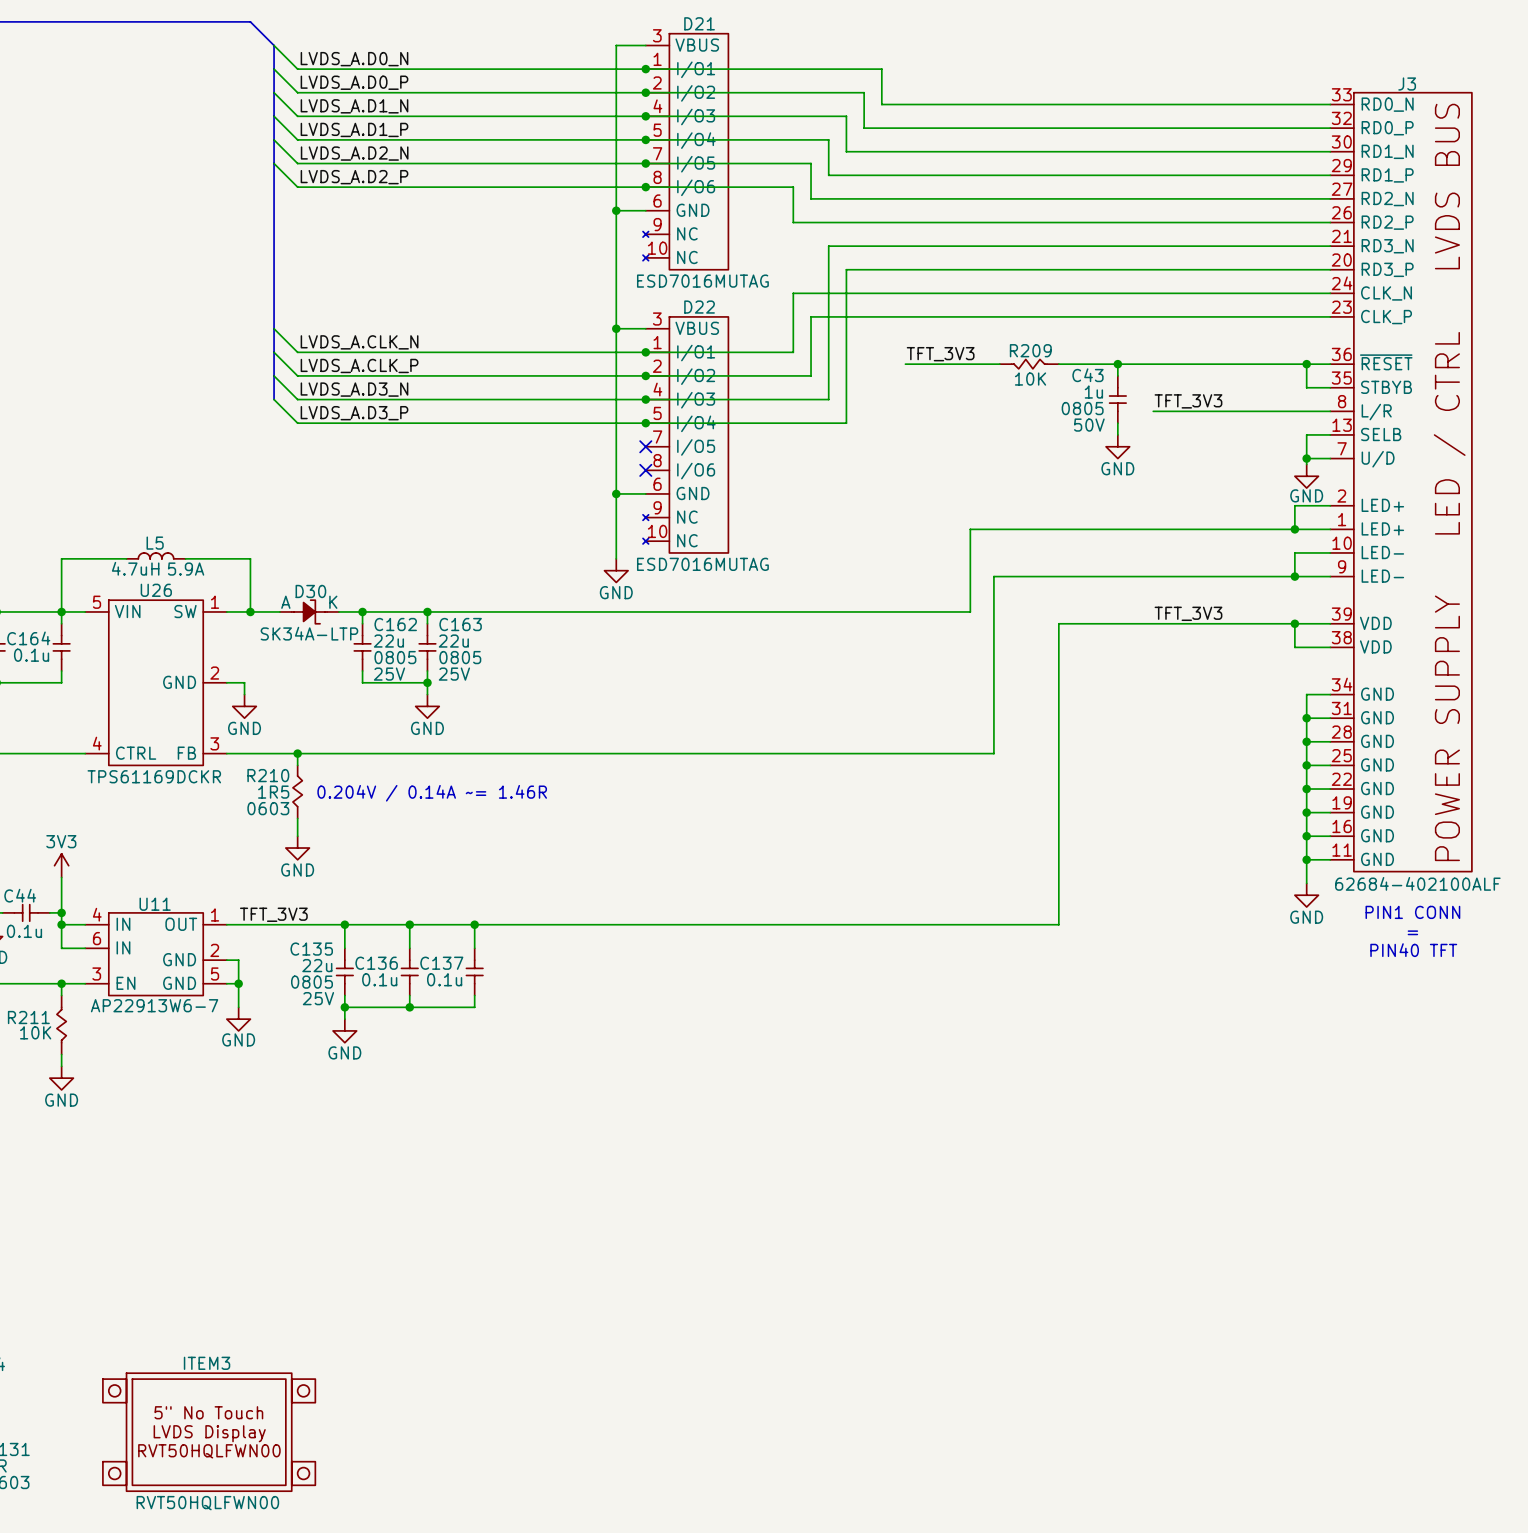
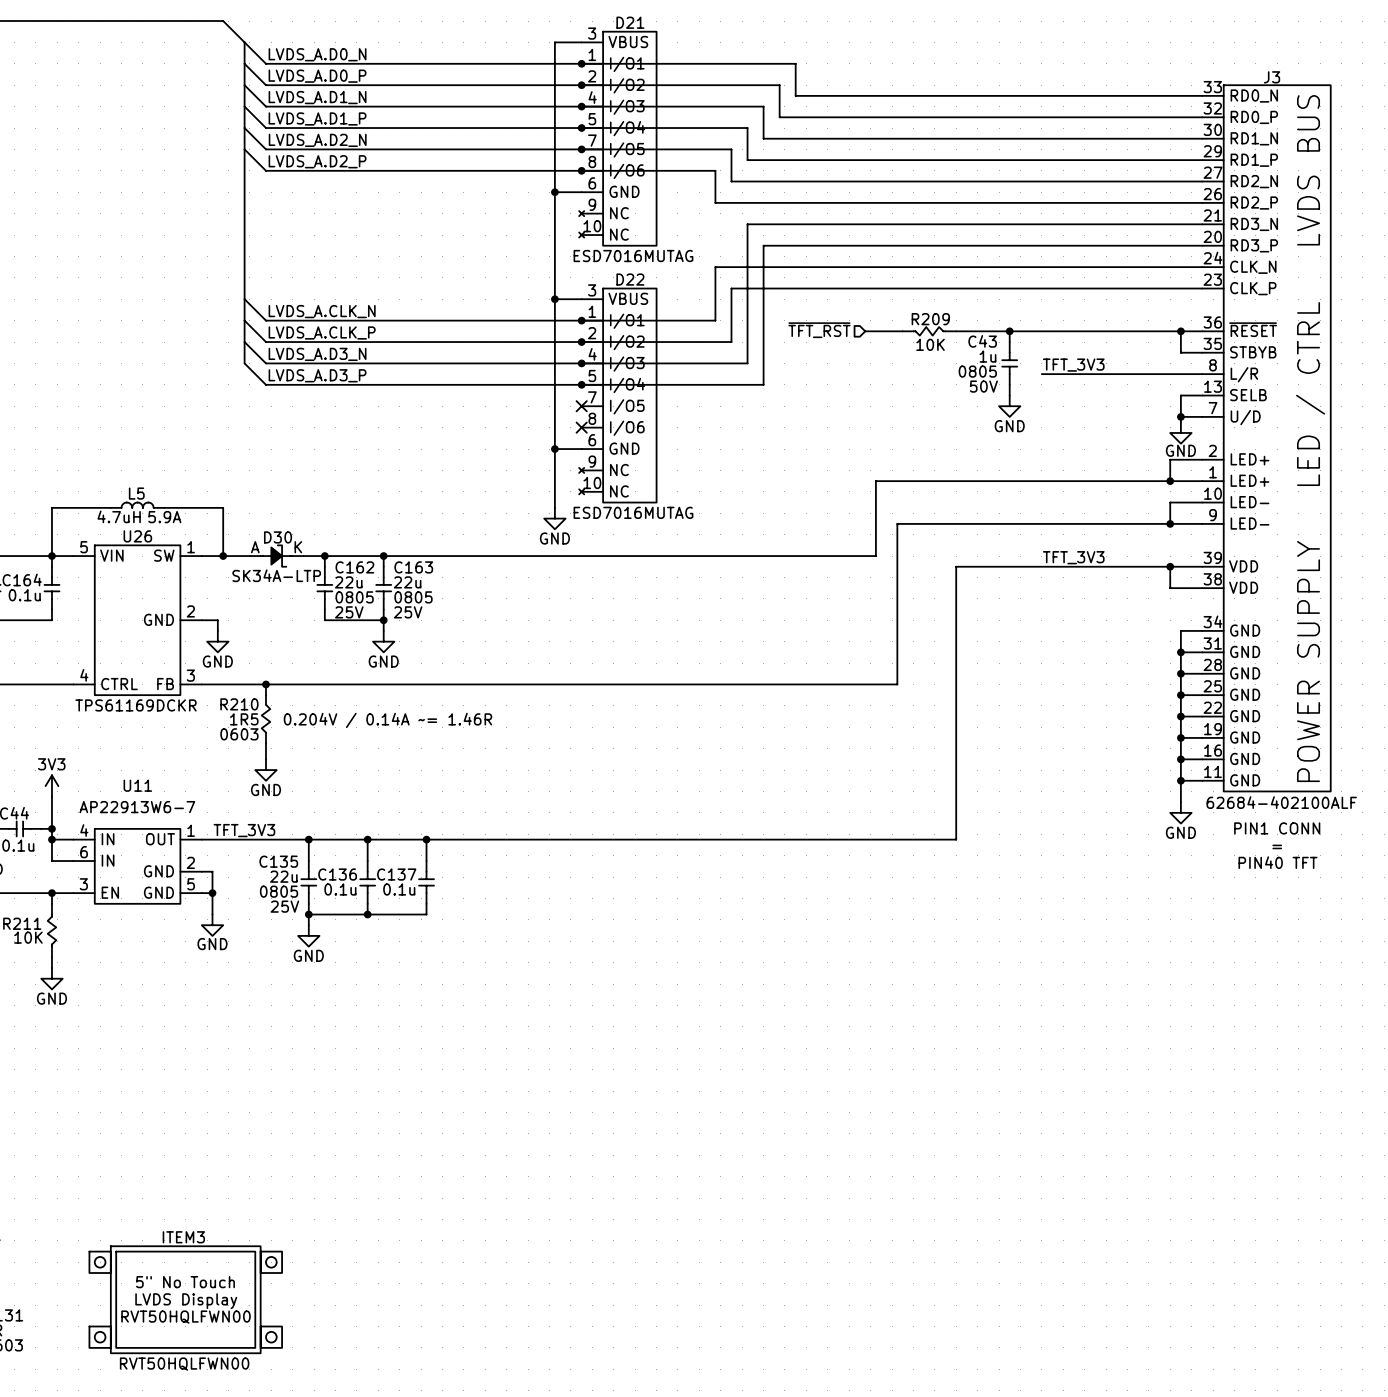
label: TFT_3V3 (940, 354) -> none
hierarchical label: none -> ~{TFT_RST} (819, 330)
wire: (905, 364) (958, 364) -> none
U11 name position: U11 (155, 904) -> U11 (137, 785)
U11 value position: AP22913W6-7 (154, 1005) -> AP22913W6-7 (137, 807)

